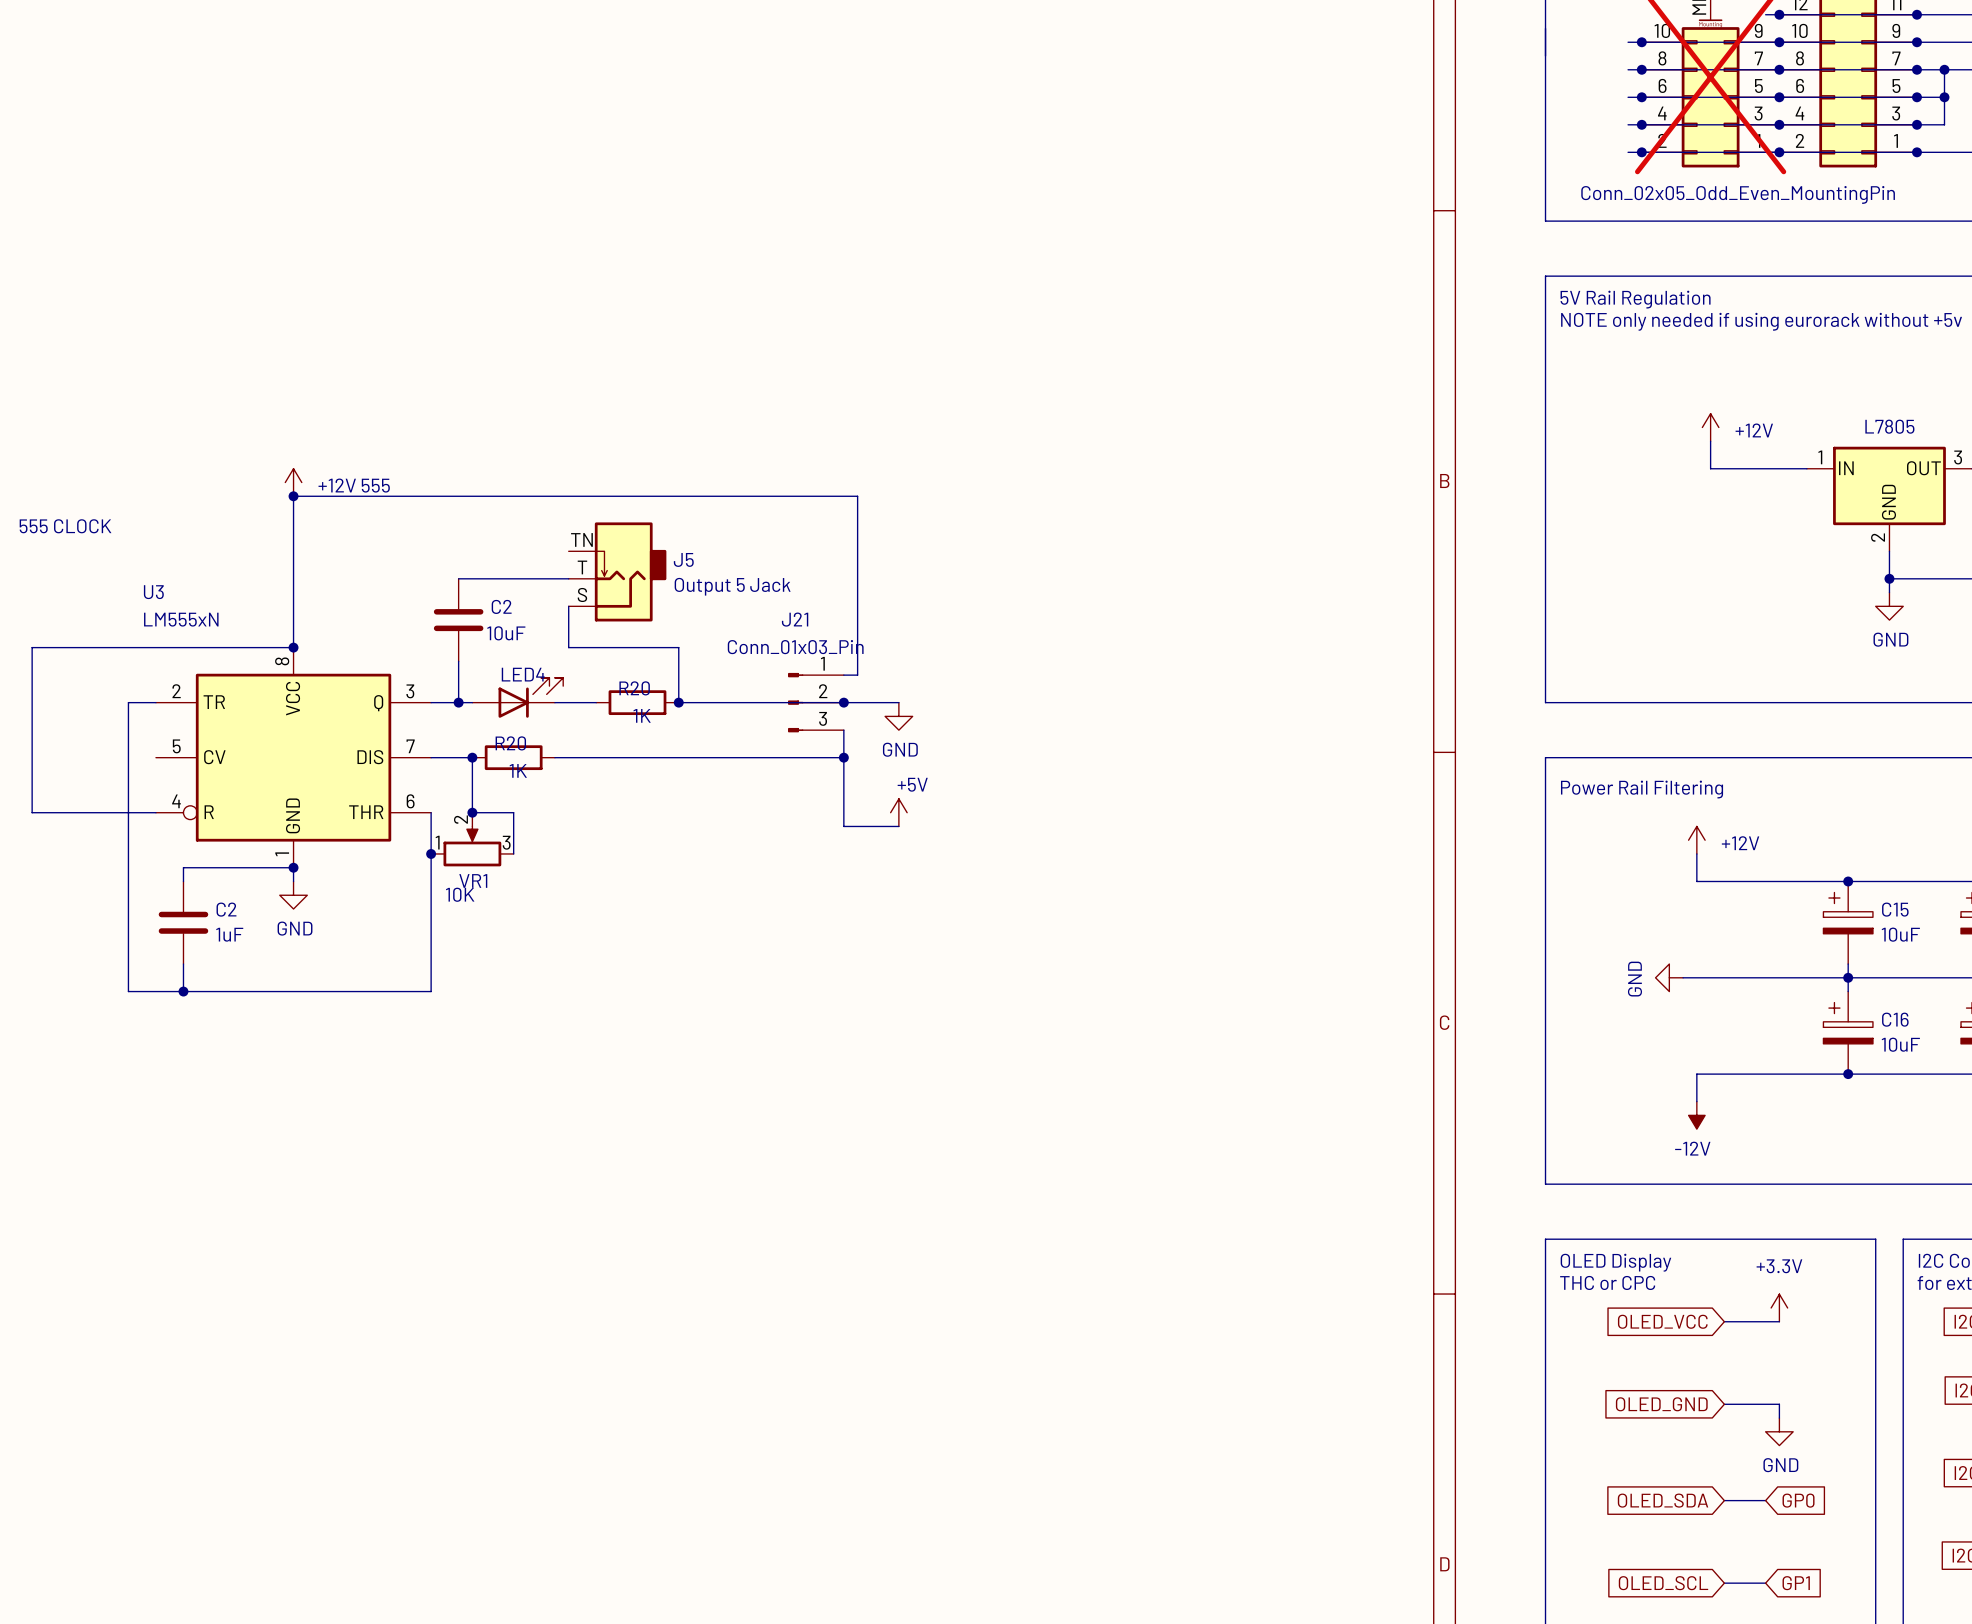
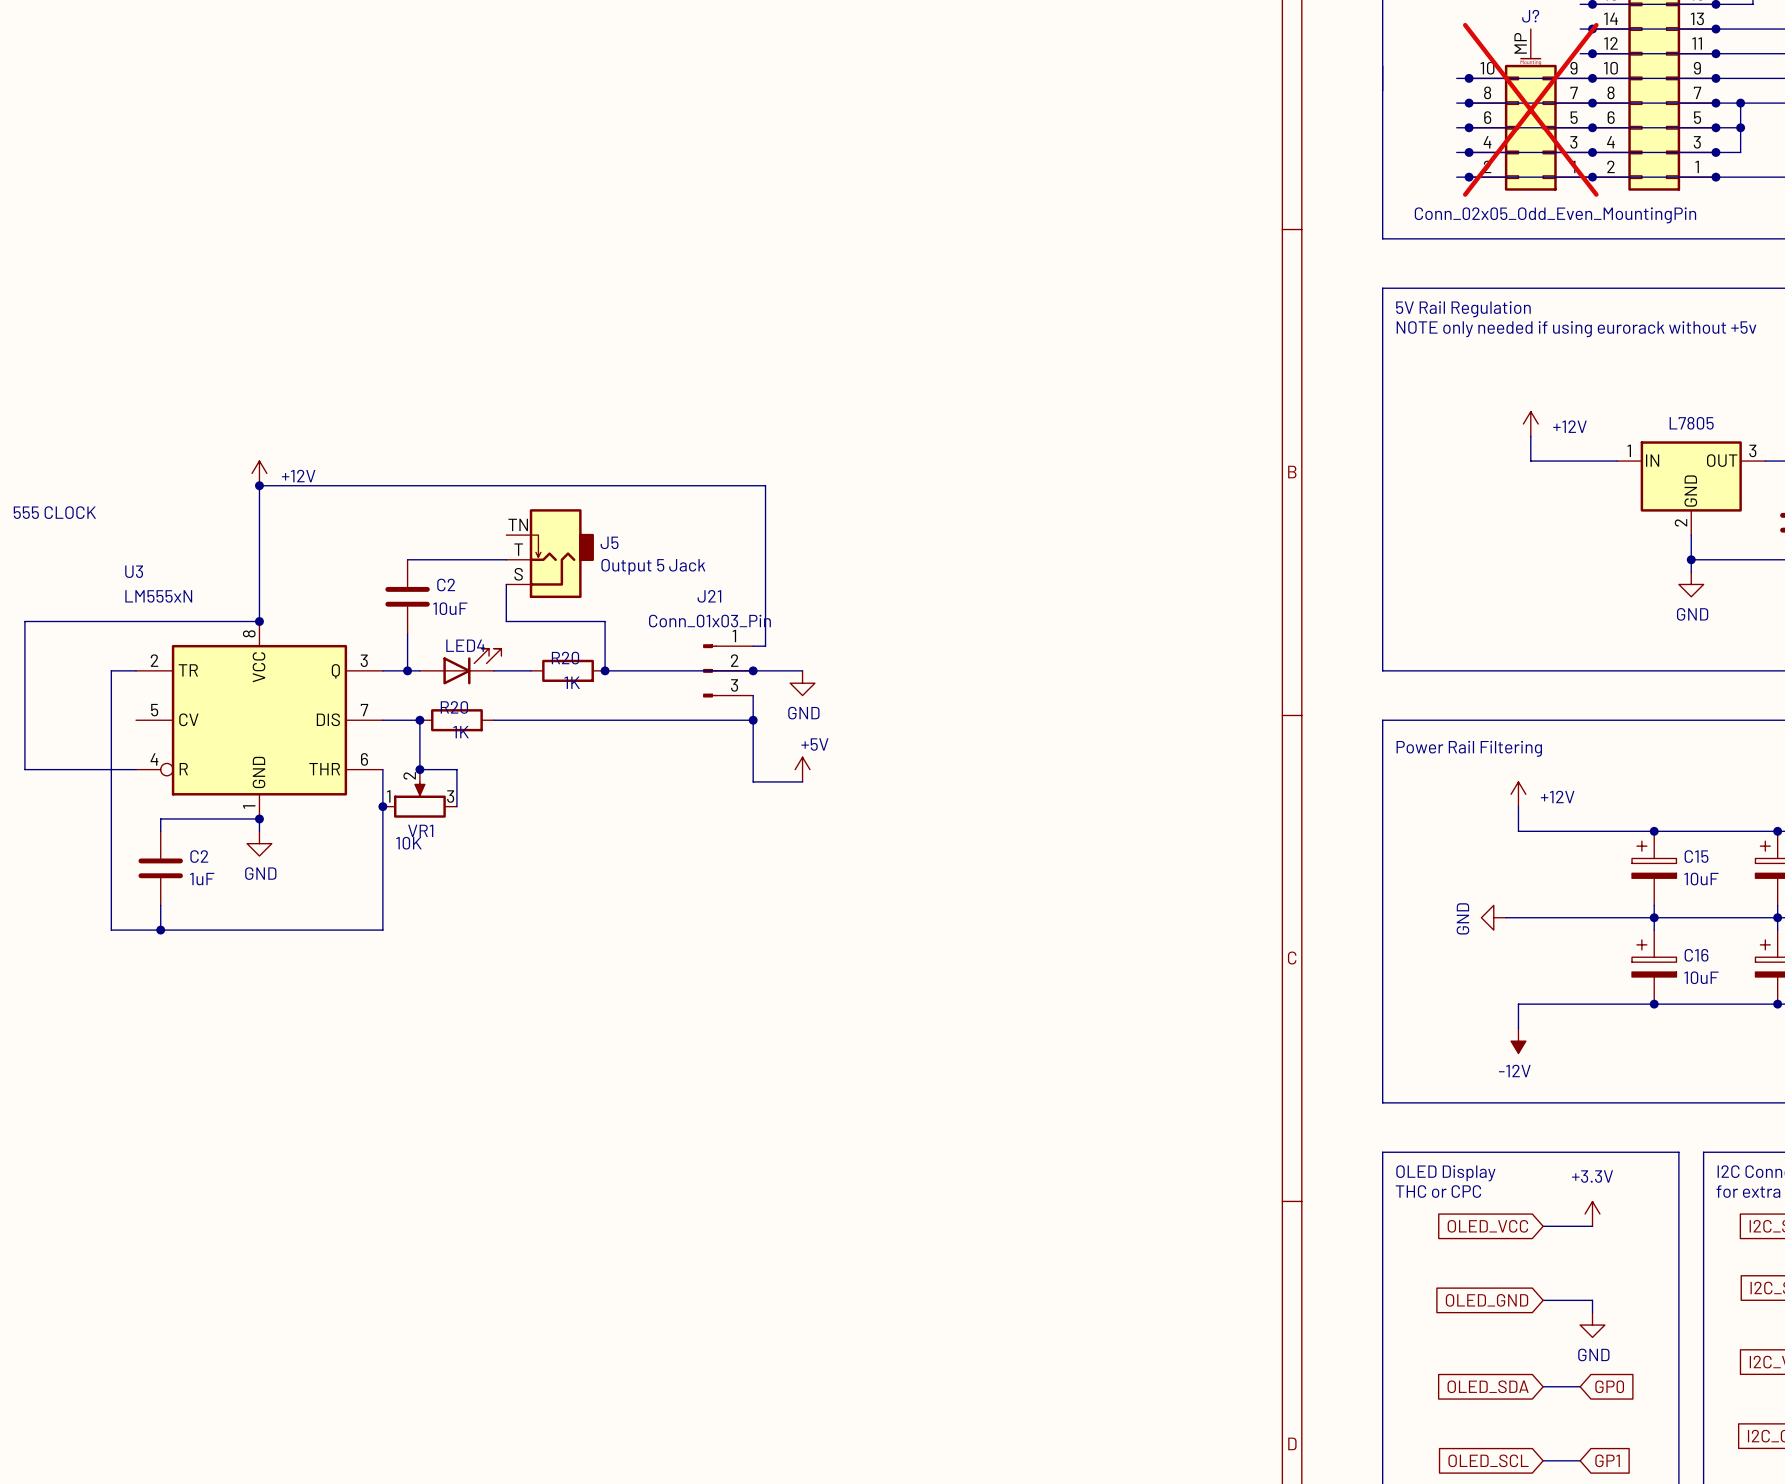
part value: +12V 555 (354, 485) -> +12V (298, 476)

